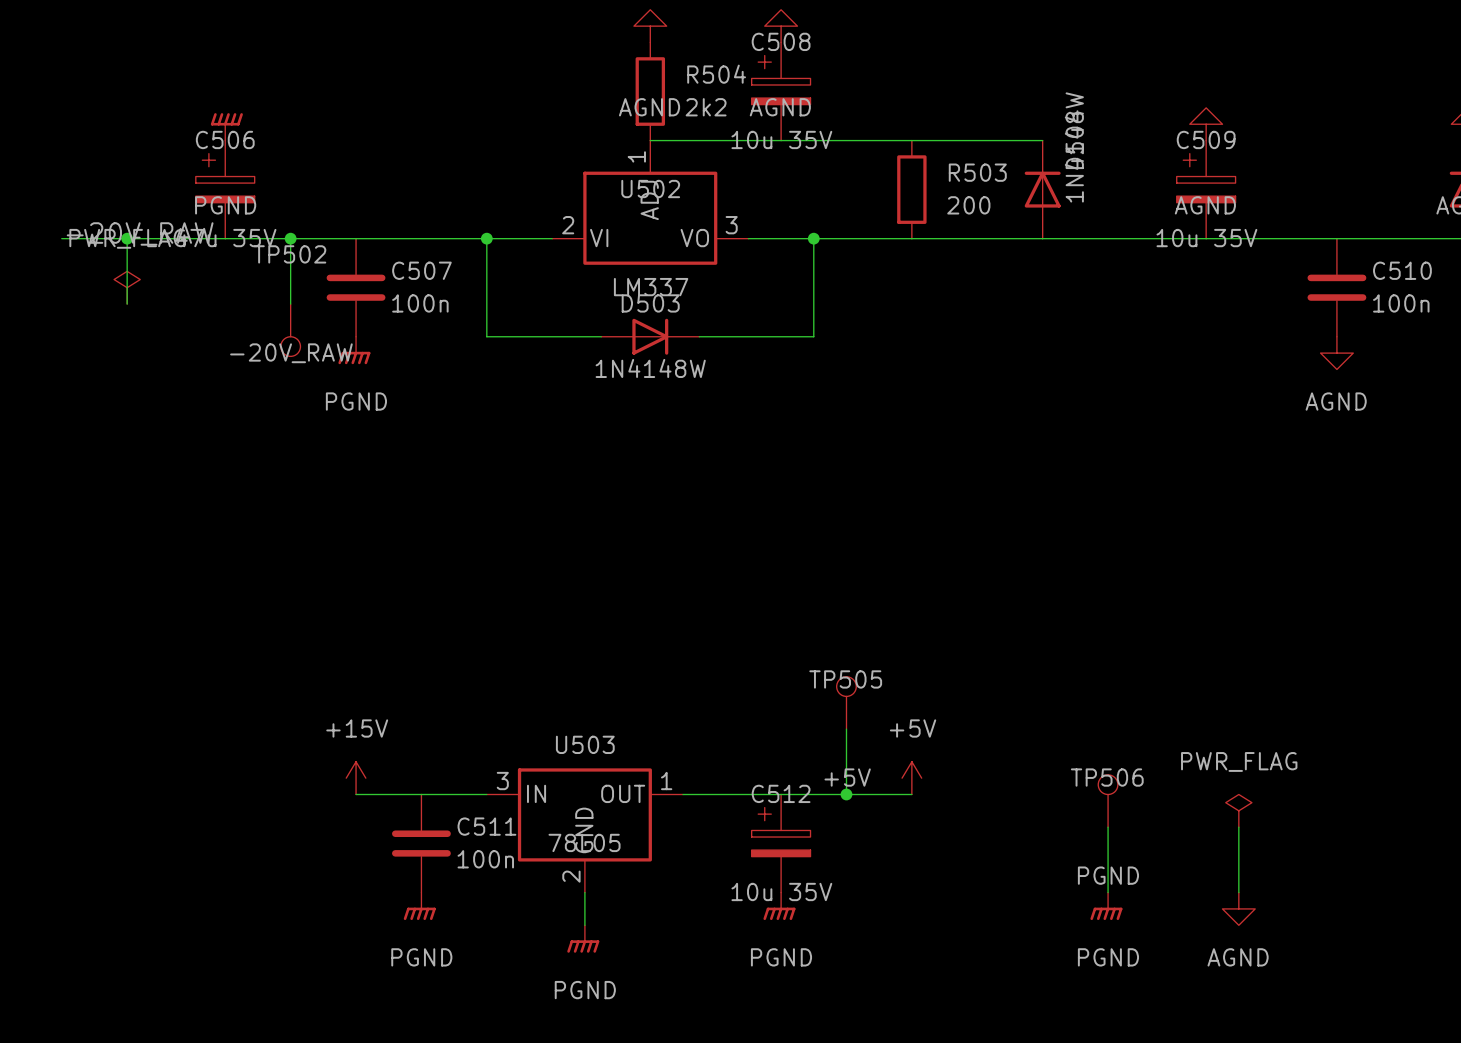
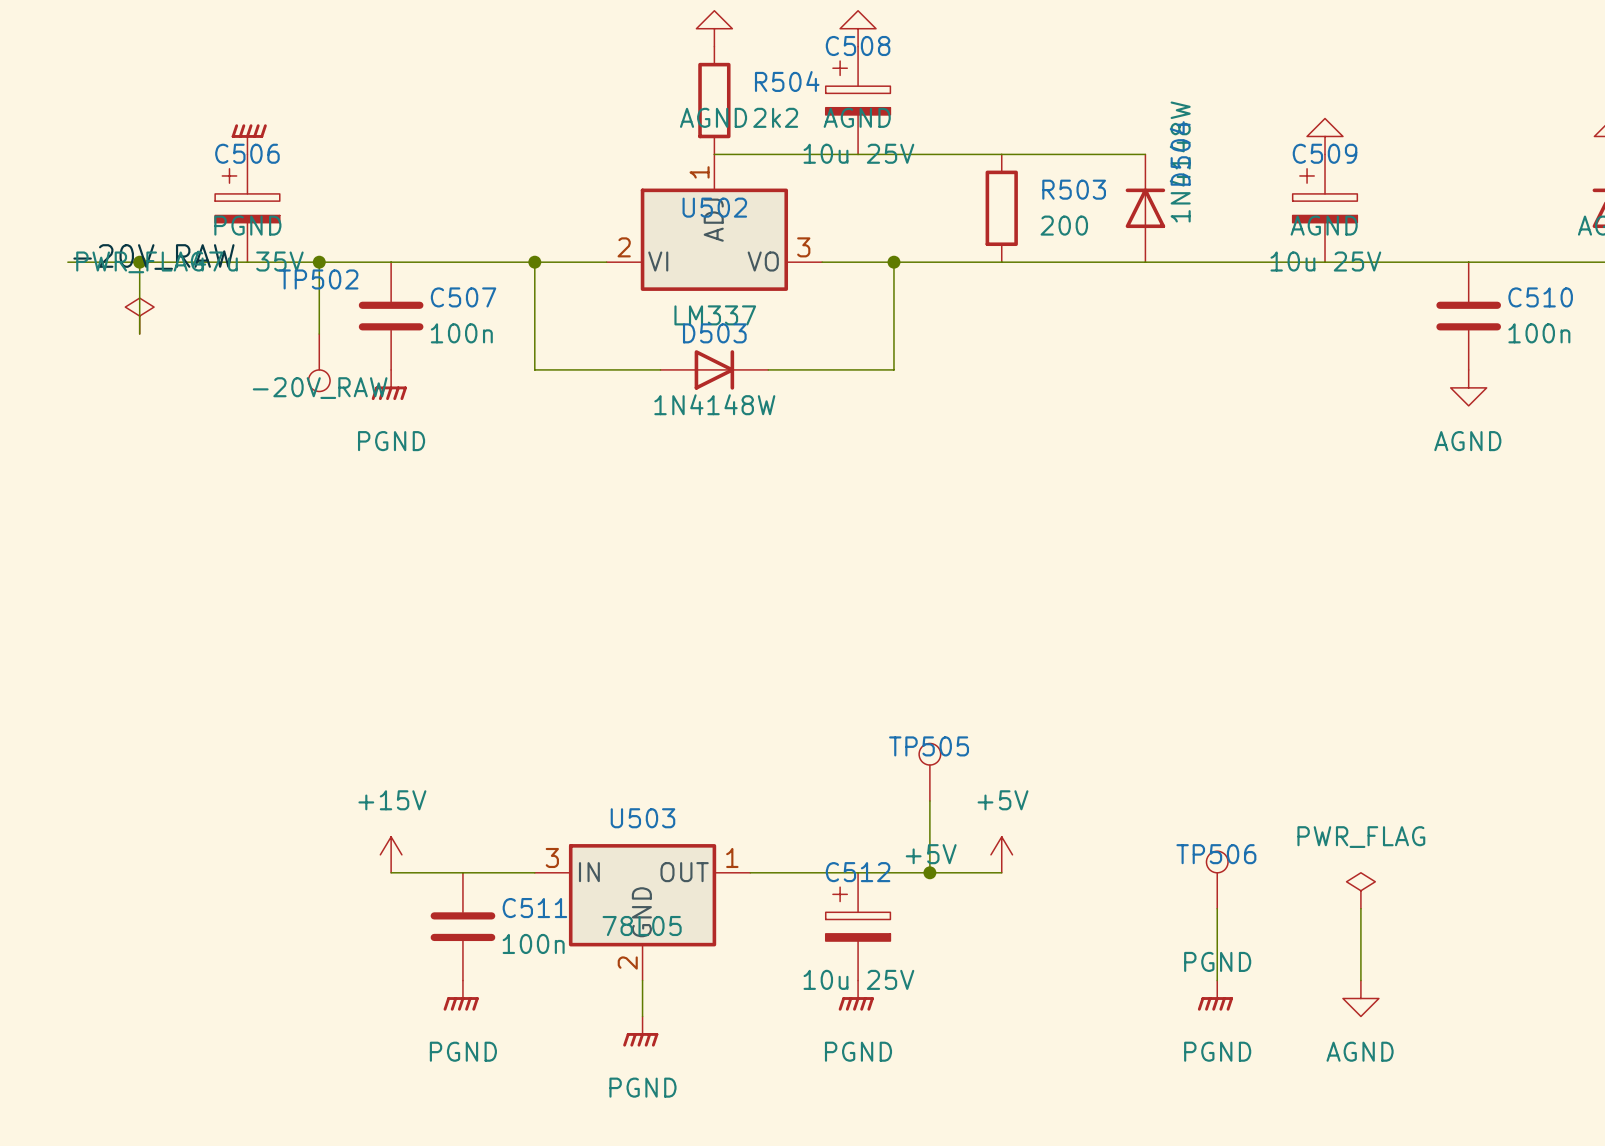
C508 value: 10u 35V (781, 139) -> 10u 25V (858, 153)
C509 value: 10u 35V (1206, 238) -> 10u 25V (1325, 261)
C512 value: 10u 35V (781, 891) -> 10u 25V (858, 979)

